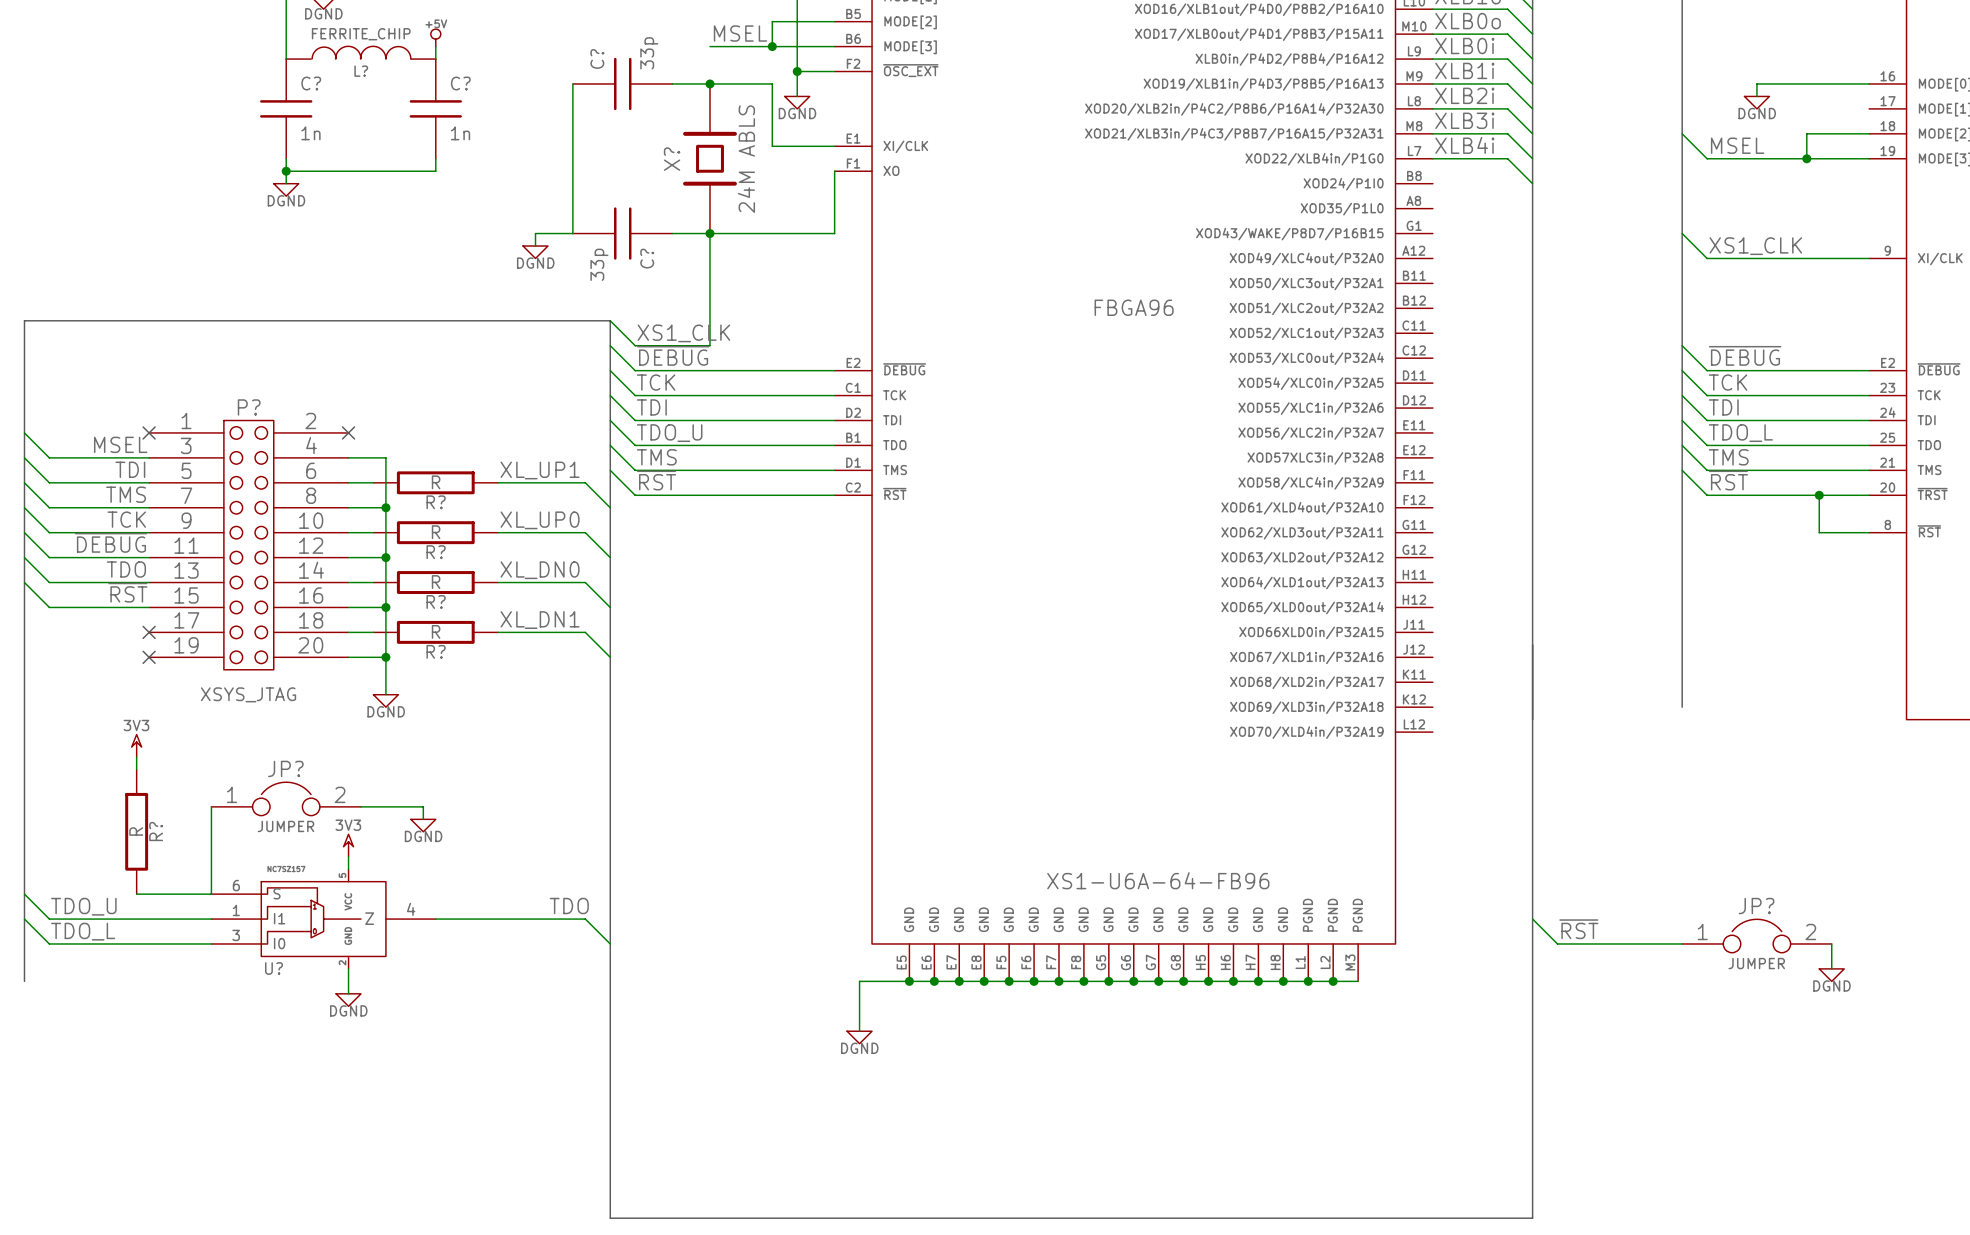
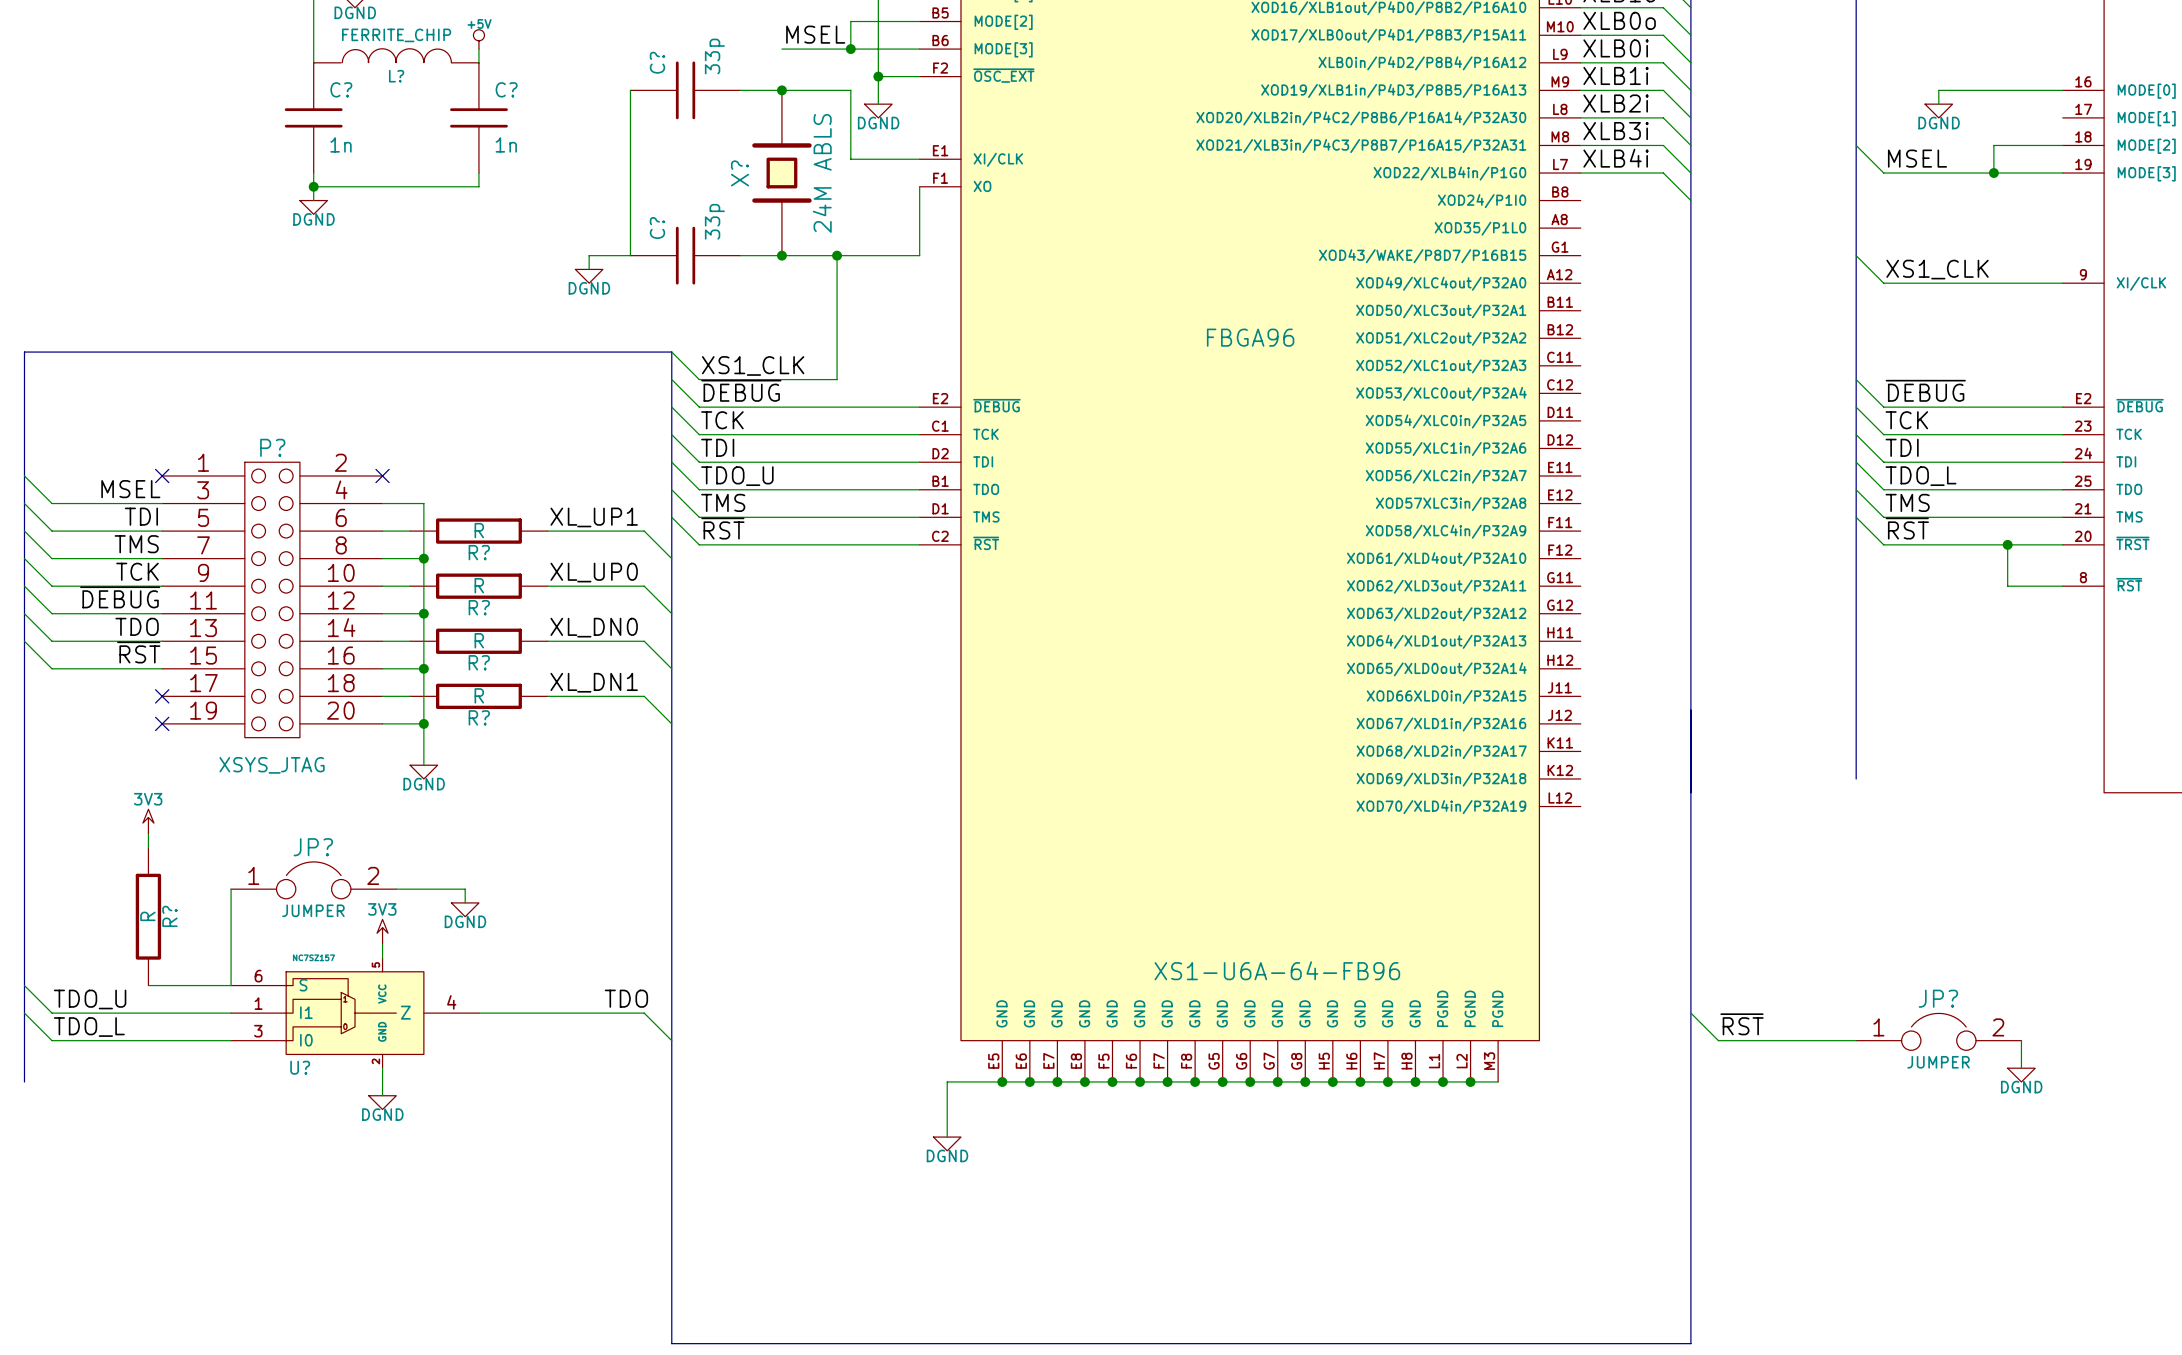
wire: (709, 233) (709, 345) -> (837, 255) (837, 379) (781, 379)
junction: none -> (837, 255)
C? name position: C? (647, 258) -> C? (657, 227)
C? value position: 33p (599, 264) -> 33p (714, 221)

